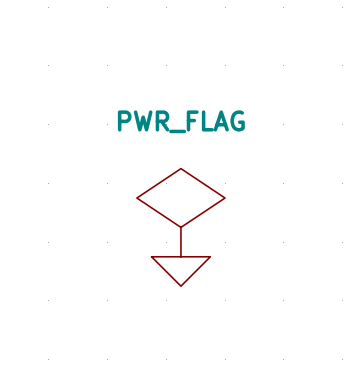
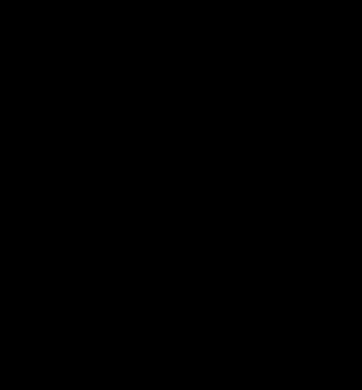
power symbol: PWR_FLAG (180, 212) -> none
power symbol: (180, 271) -> none

